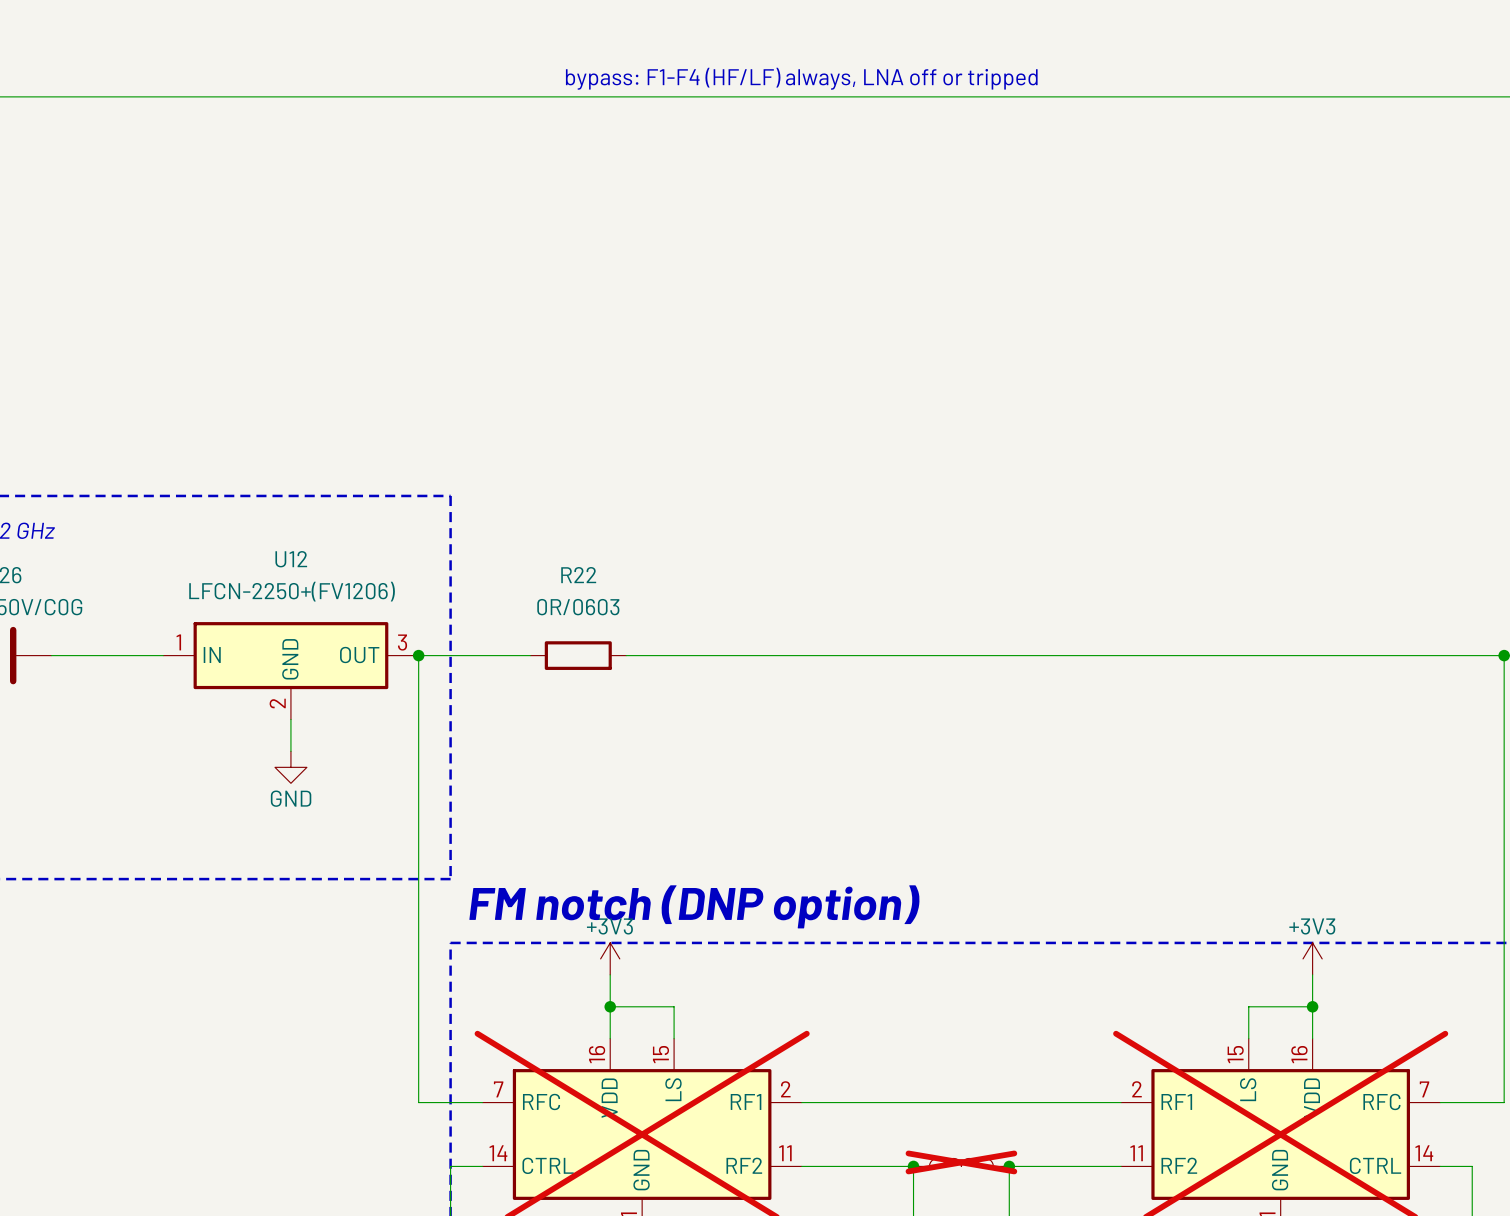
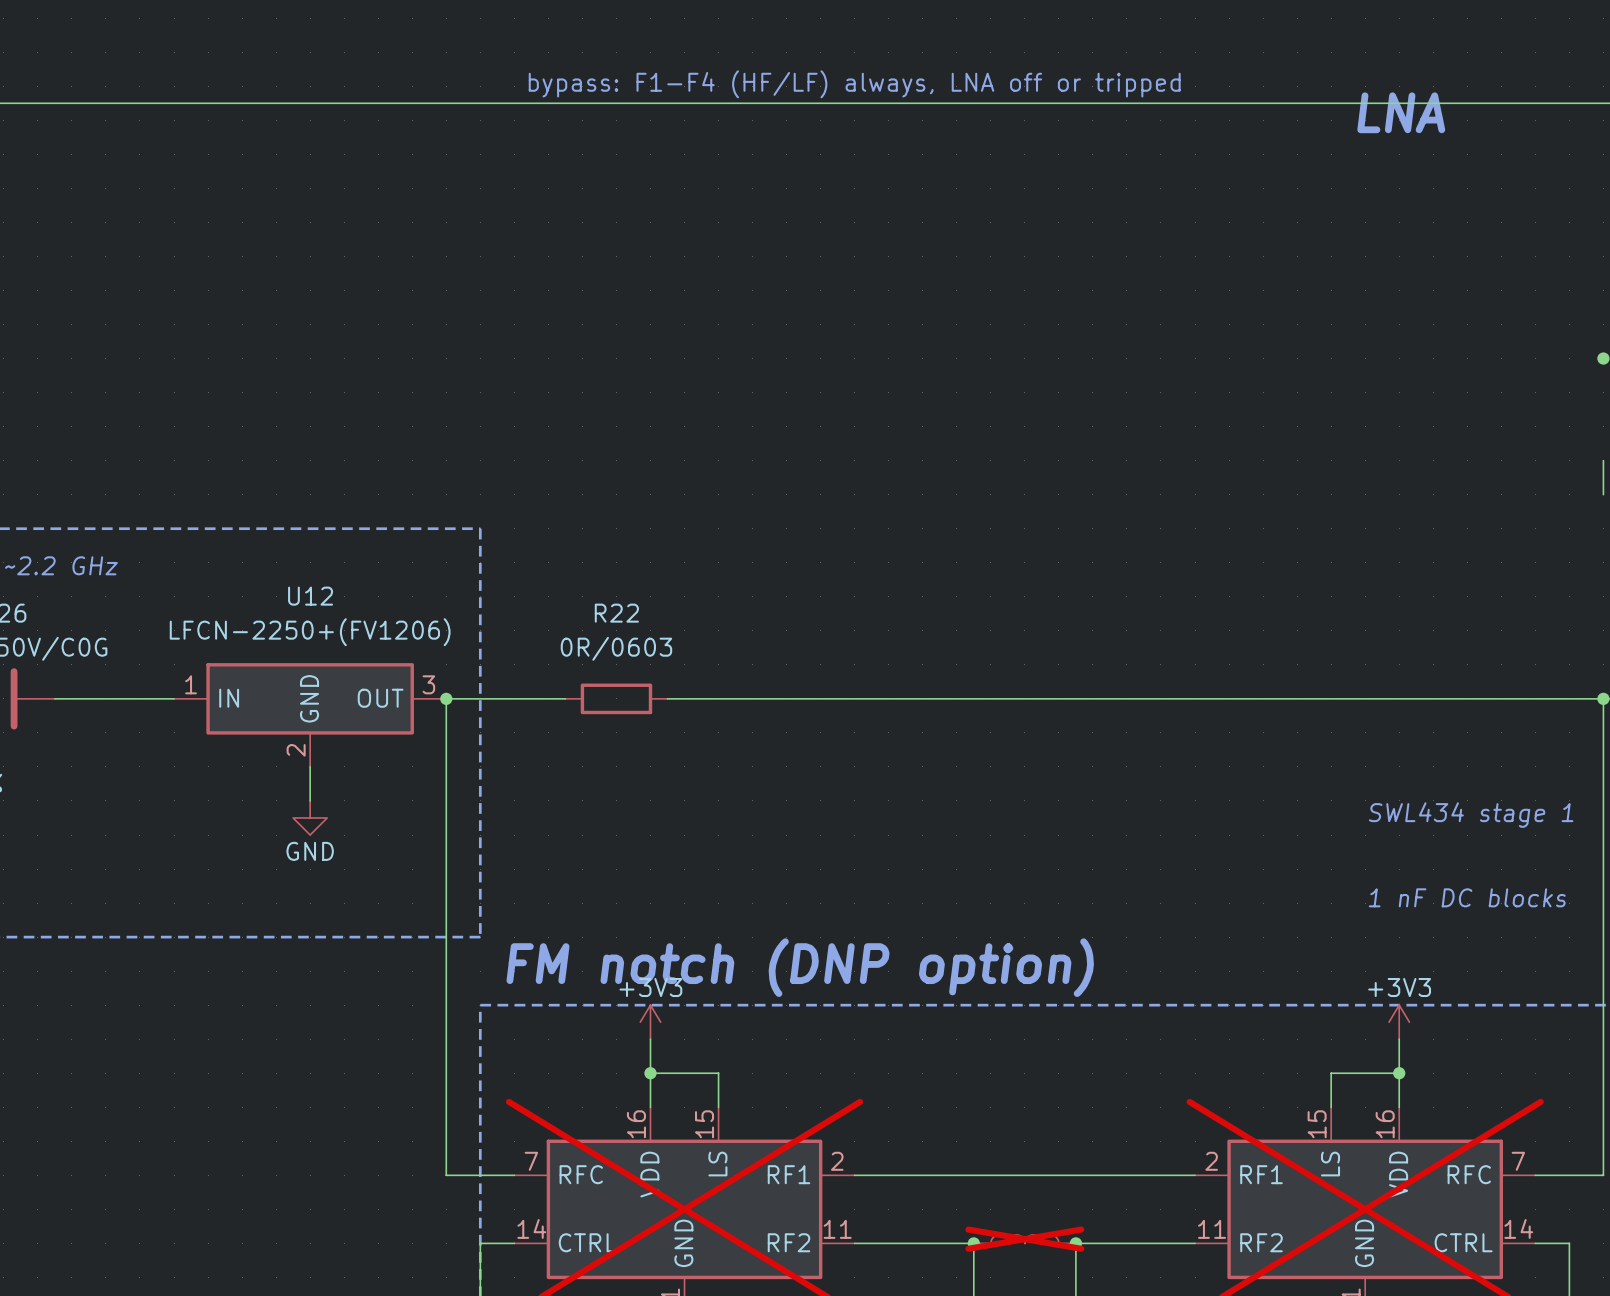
text: none -> LNA (1401, 112)
junction: none -> (1603, 358)
wire: none -> (1603, 460) (1603, 494)
text: none -> SWL434 stage 1 (1471, 815)
text: none -> 1 nF DC blocks (1467, 897)

